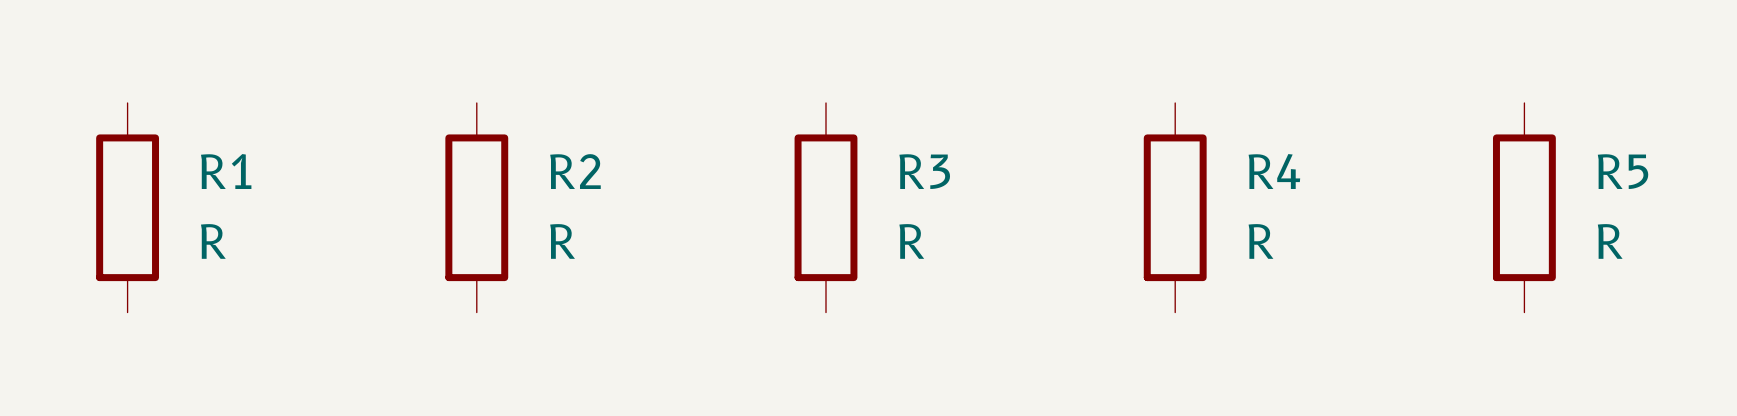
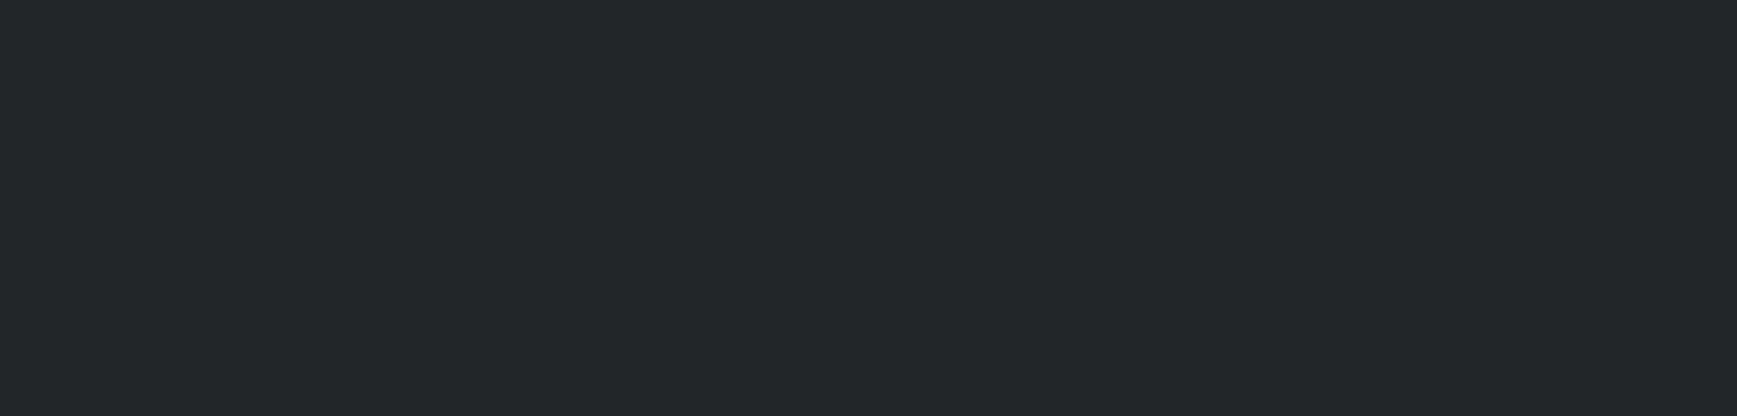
R1: R (127, 207) -> none
R2: R (476, 207) -> none
R3: R (825, 207) -> none
R4: R (1175, 207) -> none
R5: R (1524, 207) -> none

